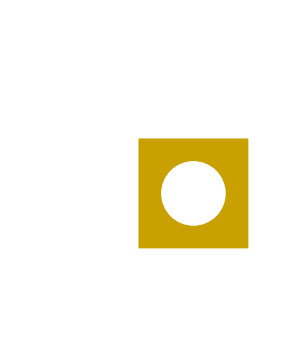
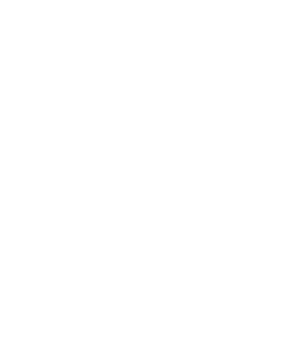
part: (193, 193) -> none

